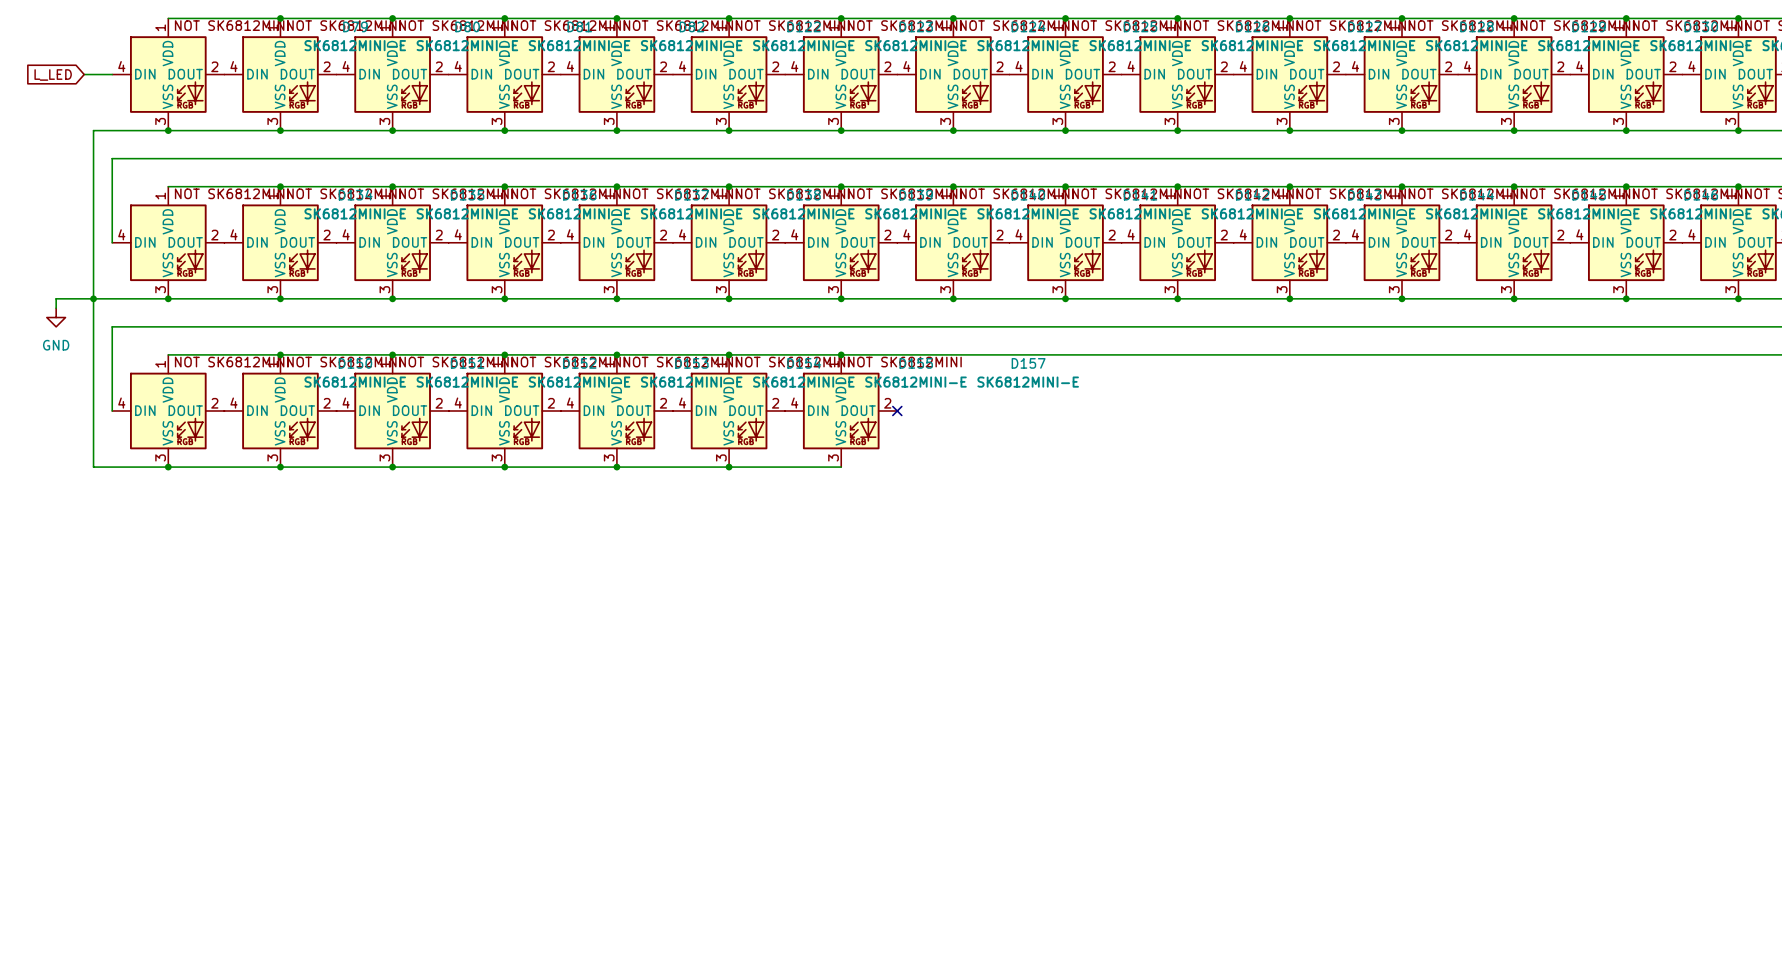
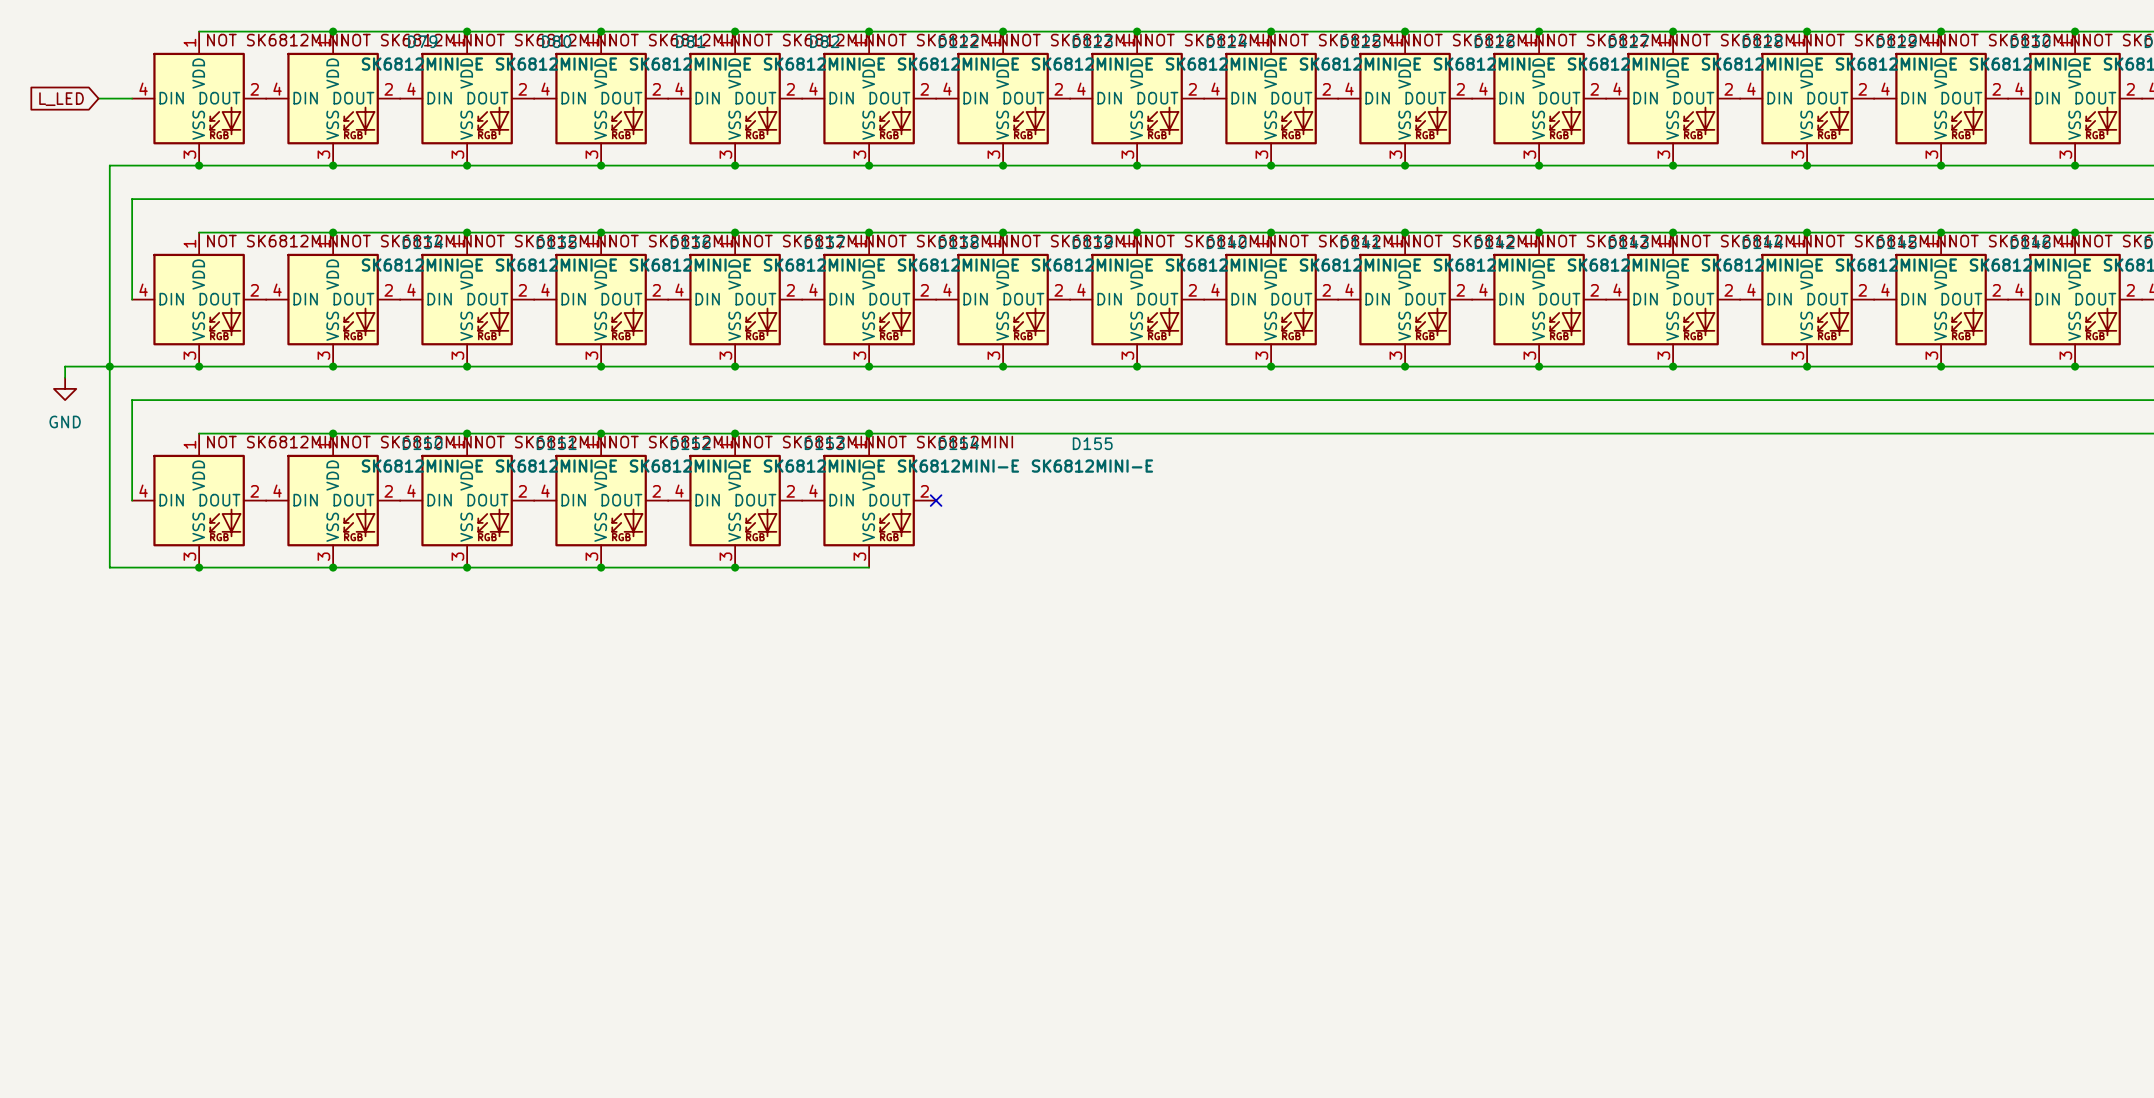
junction: (841, 354) -> none
no-connect mark: none -> (936, 500)
D157: SK6812MINI-E (841, 410) -> none
no-connect mark: (897, 410) -> none
wire: (729, 467) (841, 467) -> none
junction: (729, 467) -> none

